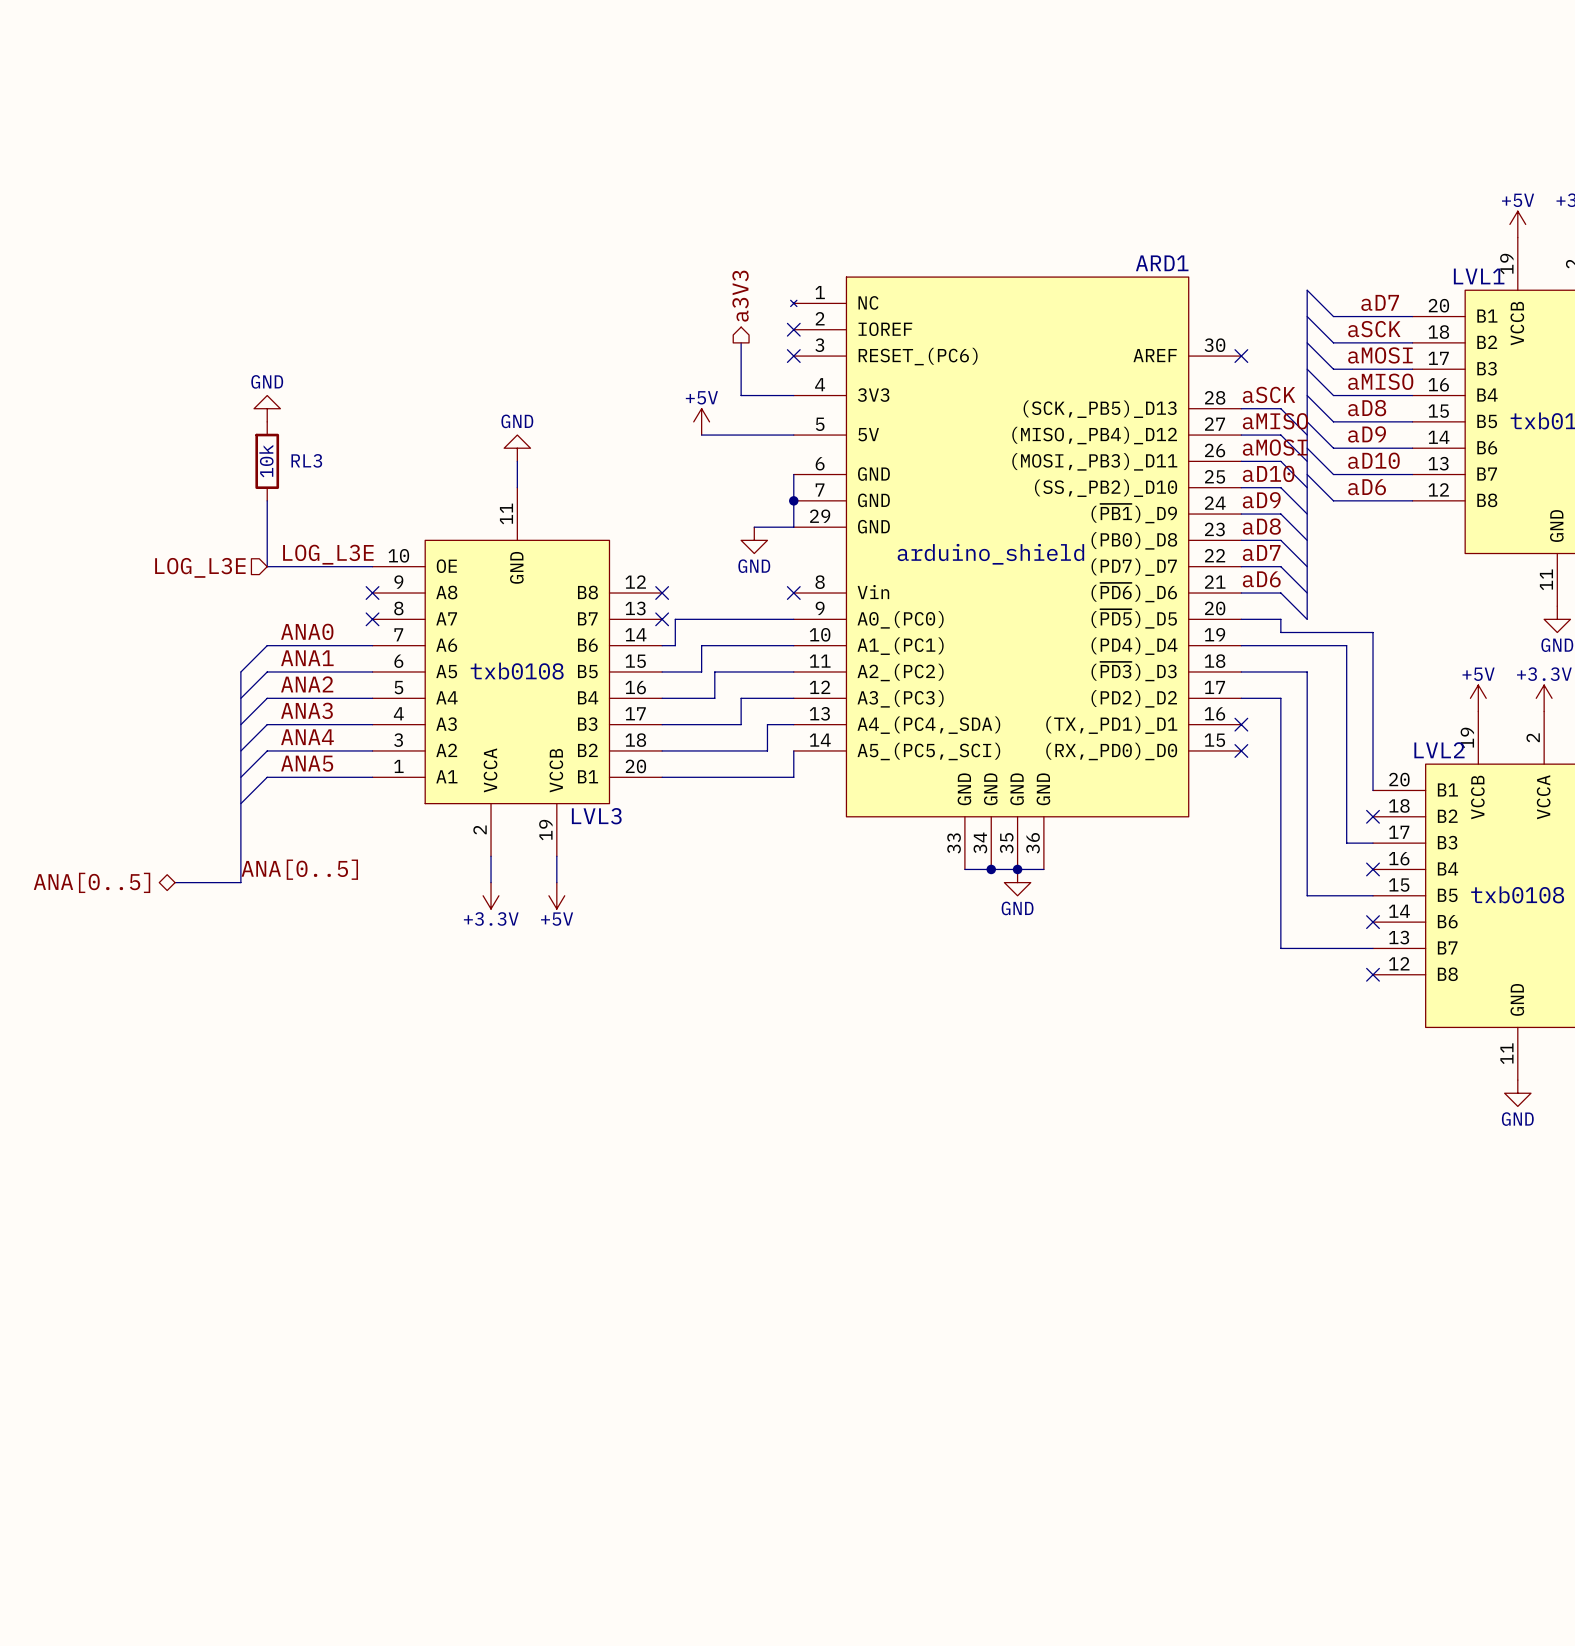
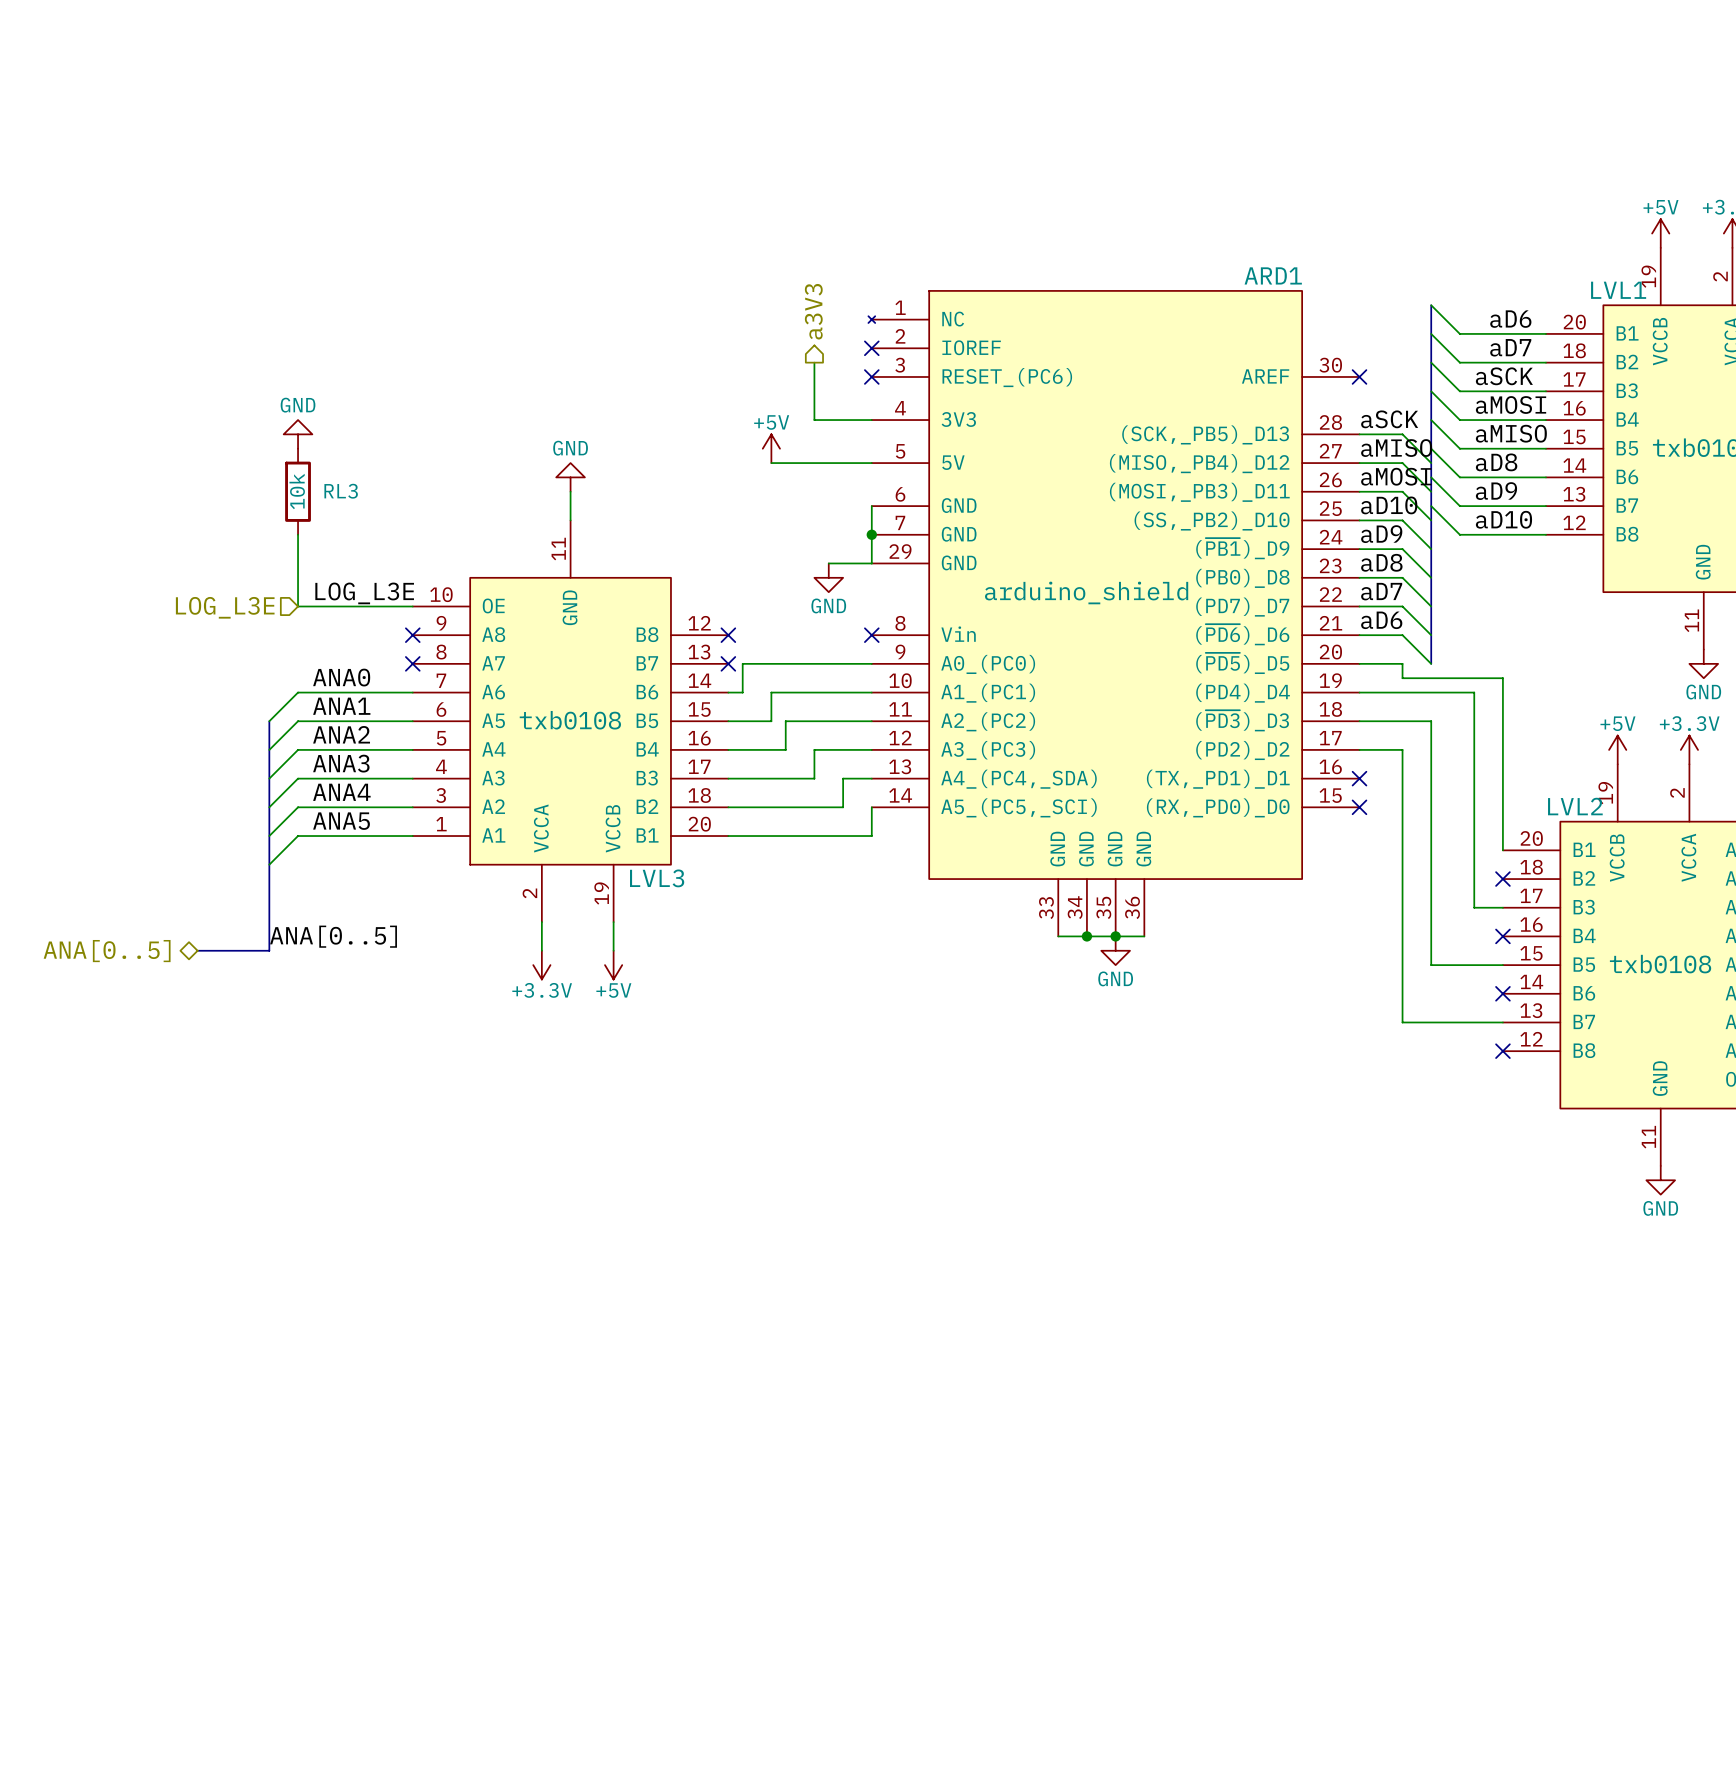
label: aD7 (1380, 302) -> aD6 (1510, 319)
label: aSCK (1374, 329) -> none
label: none -> aD7 (1510, 347)
label: aMOSI (1380, 355) -> aSCK (1504, 376)
label: aMISO (1380, 381) -> aMOSI (1511, 405)
label: aD8 (1367, 408) -> aMISO (1511, 433)
label: aD9 (1367, 434) -> aD8 (1496, 462)
label: aD10 (1373, 460) -> aD9 (1496, 491)
label: aD6 (1367, 487) -> aD10 (1503, 519)

